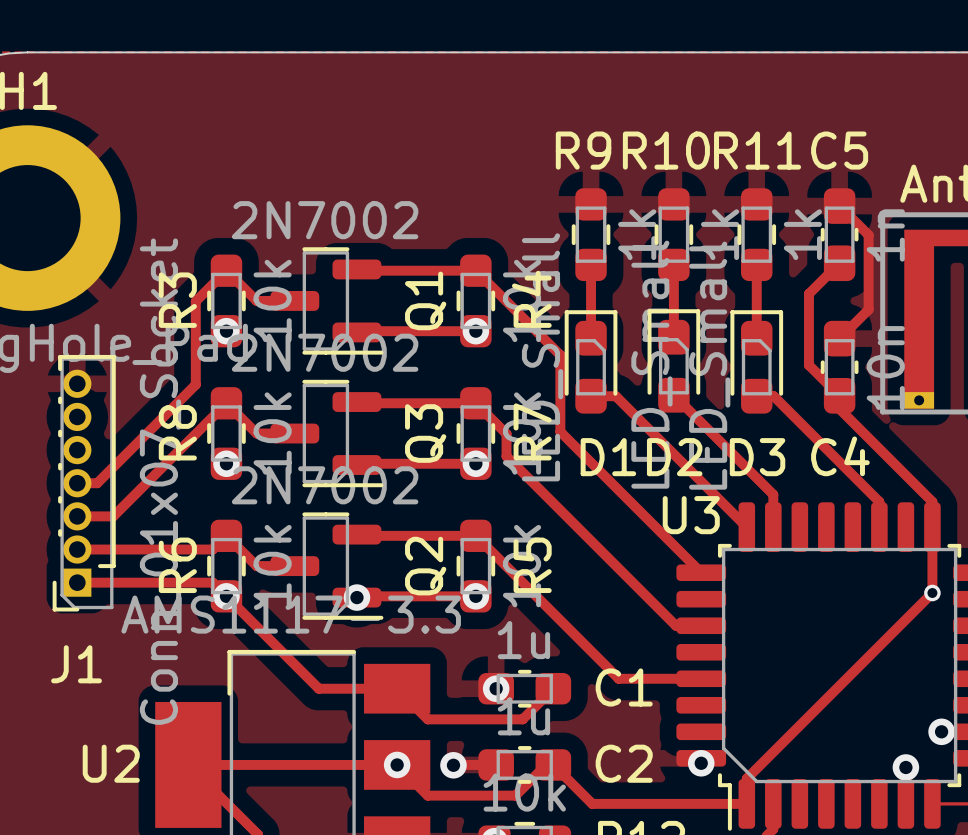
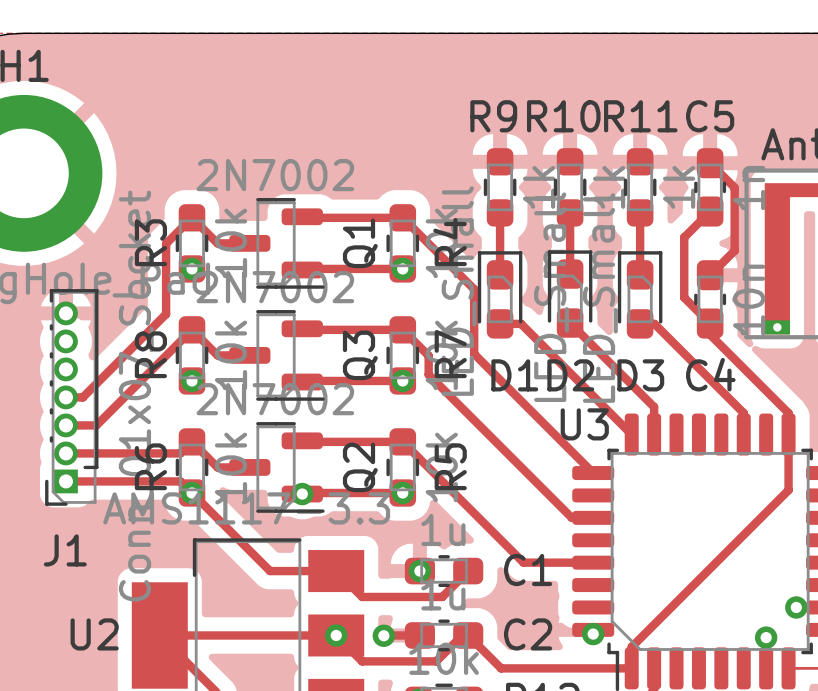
via: (932, 593) -> none

